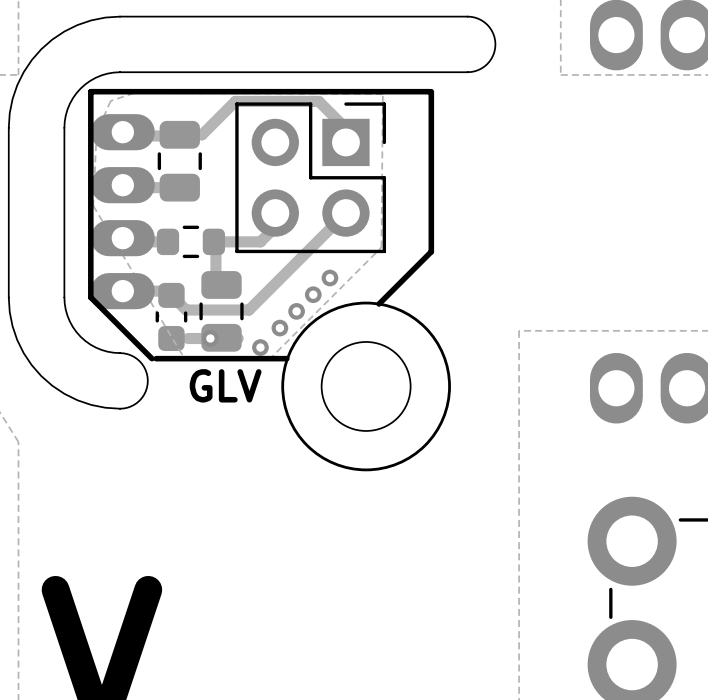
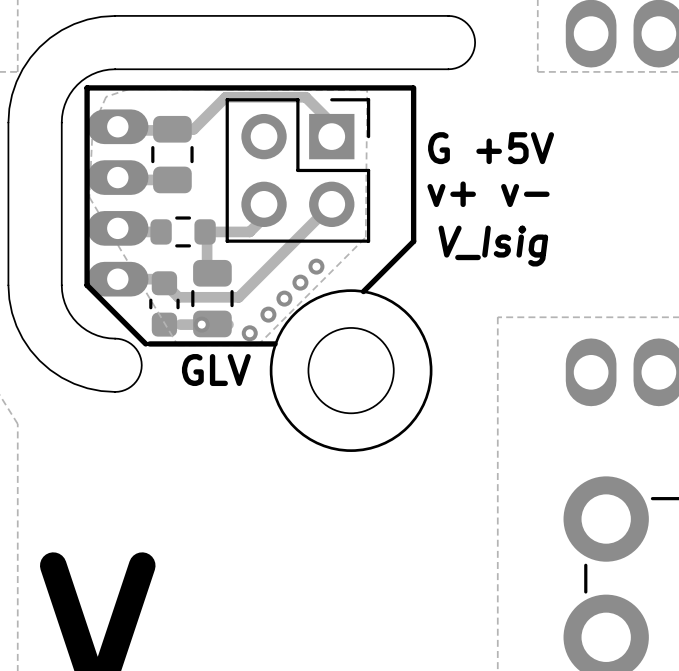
text: none -> G +5V (491, 148)
text: none -> v+ v- (488, 194)
text: none -> V_Isig (493, 246)

